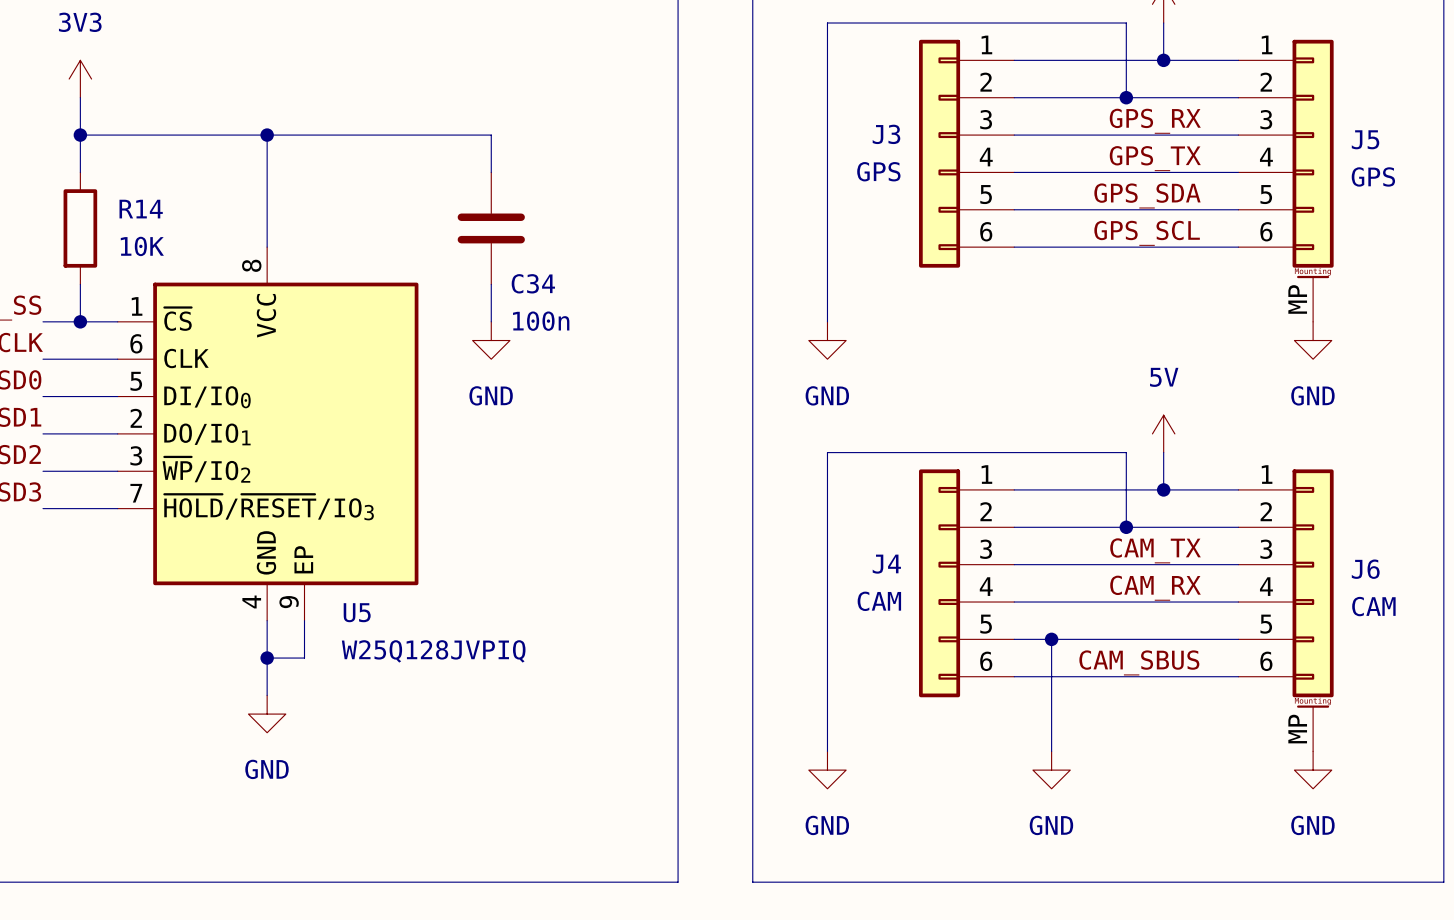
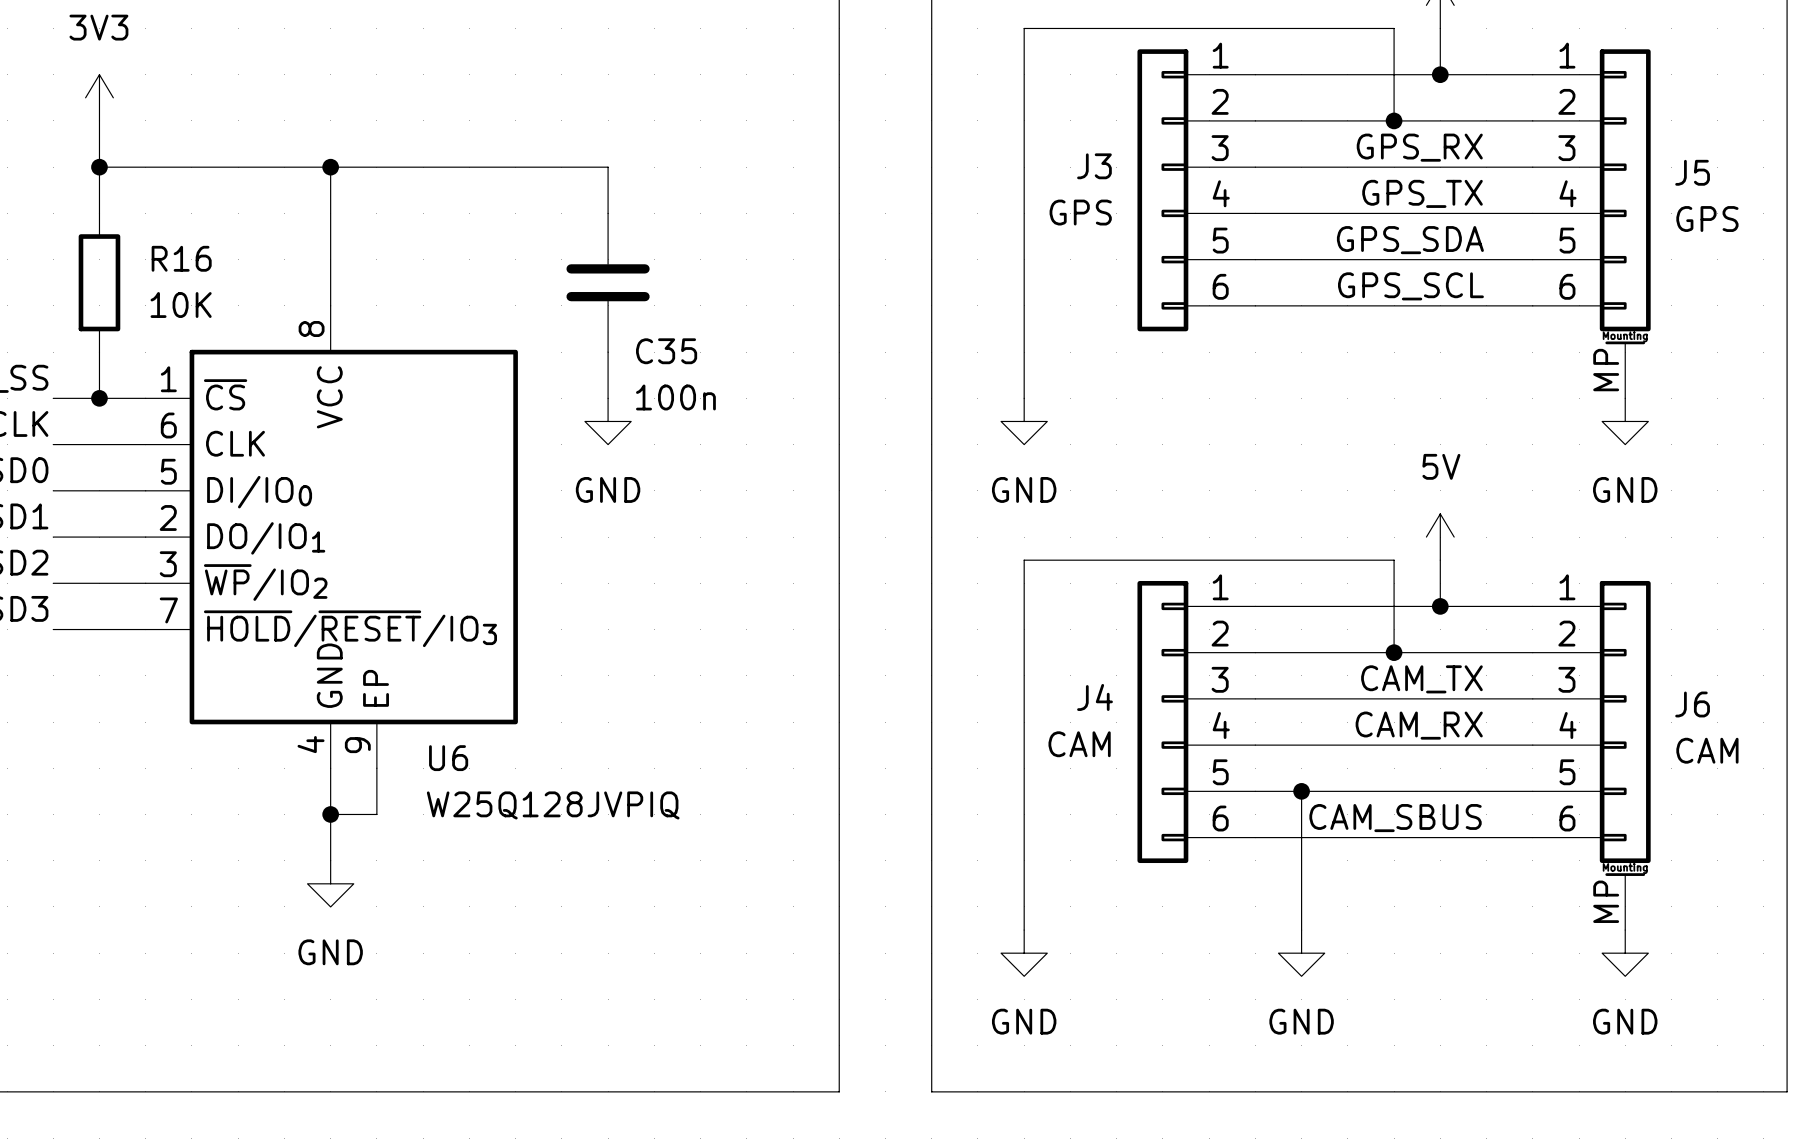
R14 name: R14 (141, 209) -> R16 (181, 258)
C34 name: C34 (533, 283) -> C35 (666, 351)
U5 name: U5 (357, 612) -> U6 (448, 758)

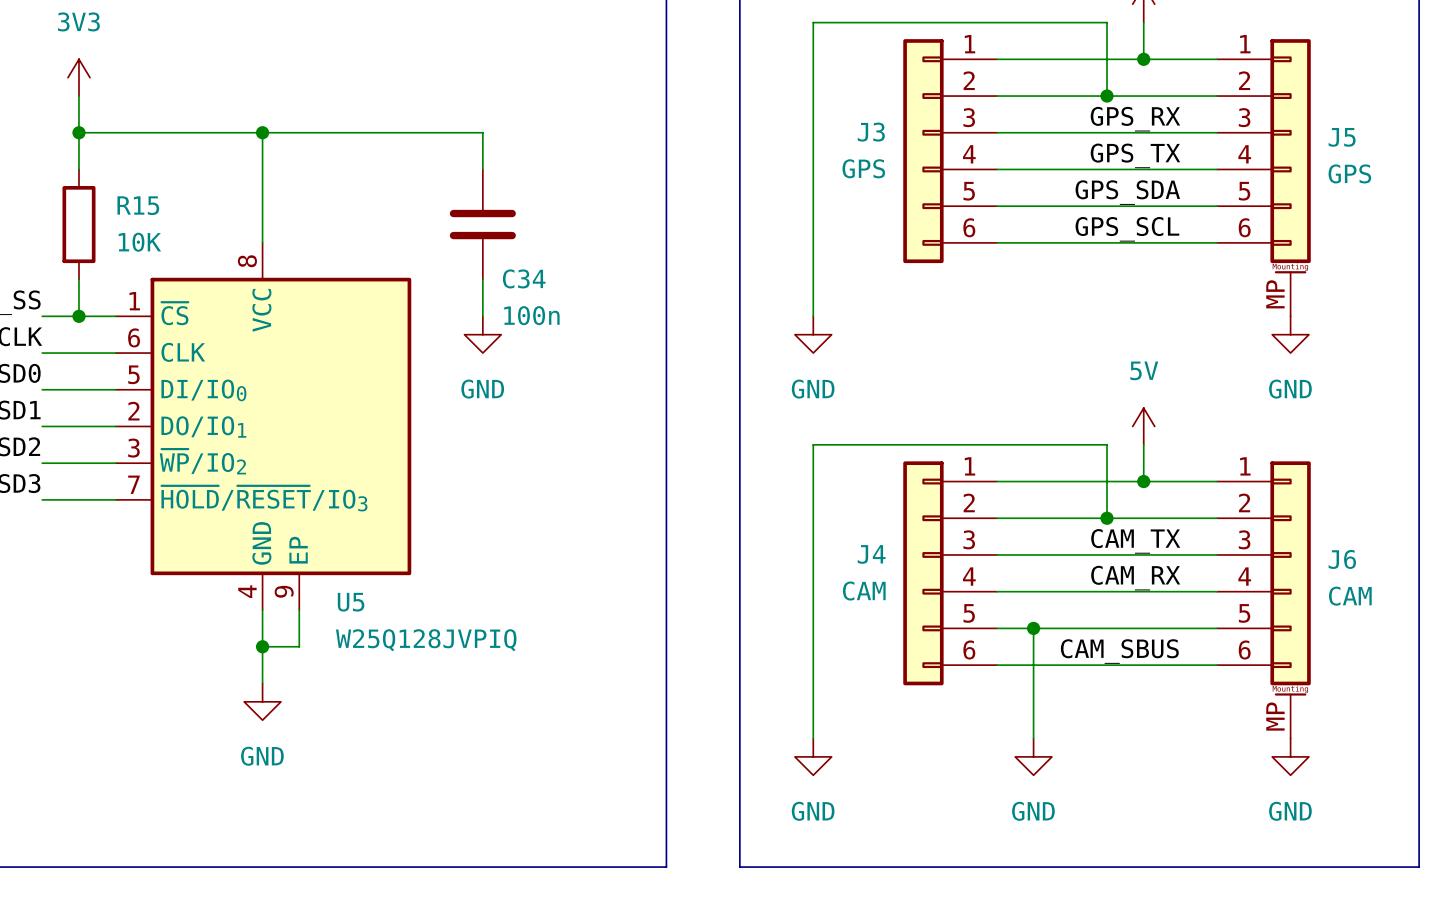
R16 name: R16 (181, 258) -> R15 (138, 205)
C35 name: C35 (666, 351) -> C34 (524, 278)
U6 name: U6 (448, 758) -> U5 (351, 602)

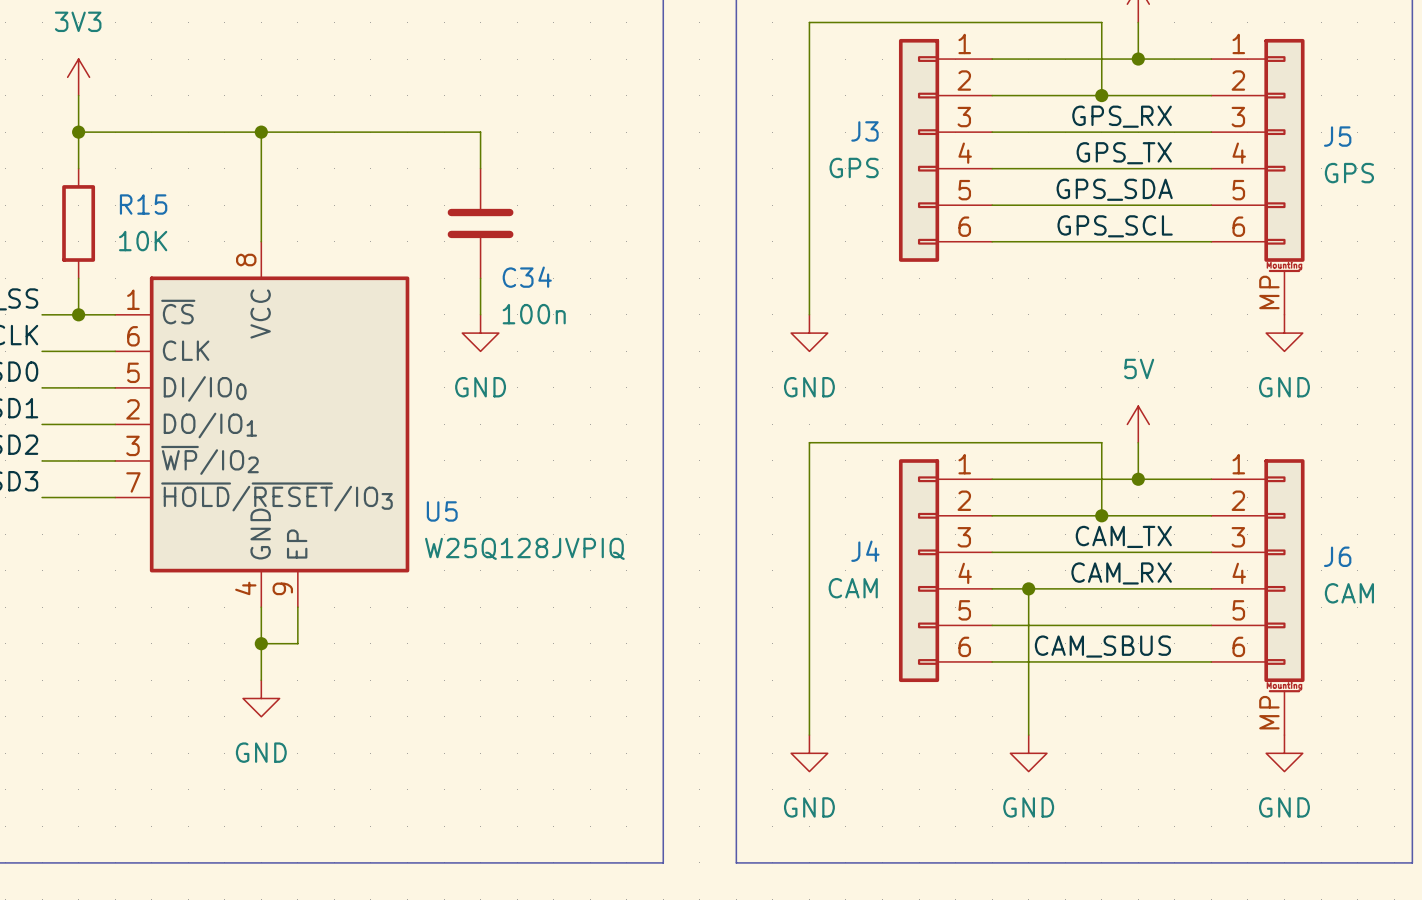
wire: none -> (1028, 588) (1028, 625)
U5 name position: U5 (351, 602) -> U5 (442, 511)
junction position: (1033, 628) -> (1028, 588)
U5 value position: W25Q128JVPIQ (426, 640) -> W25Q128JVPIQ (524, 548)

